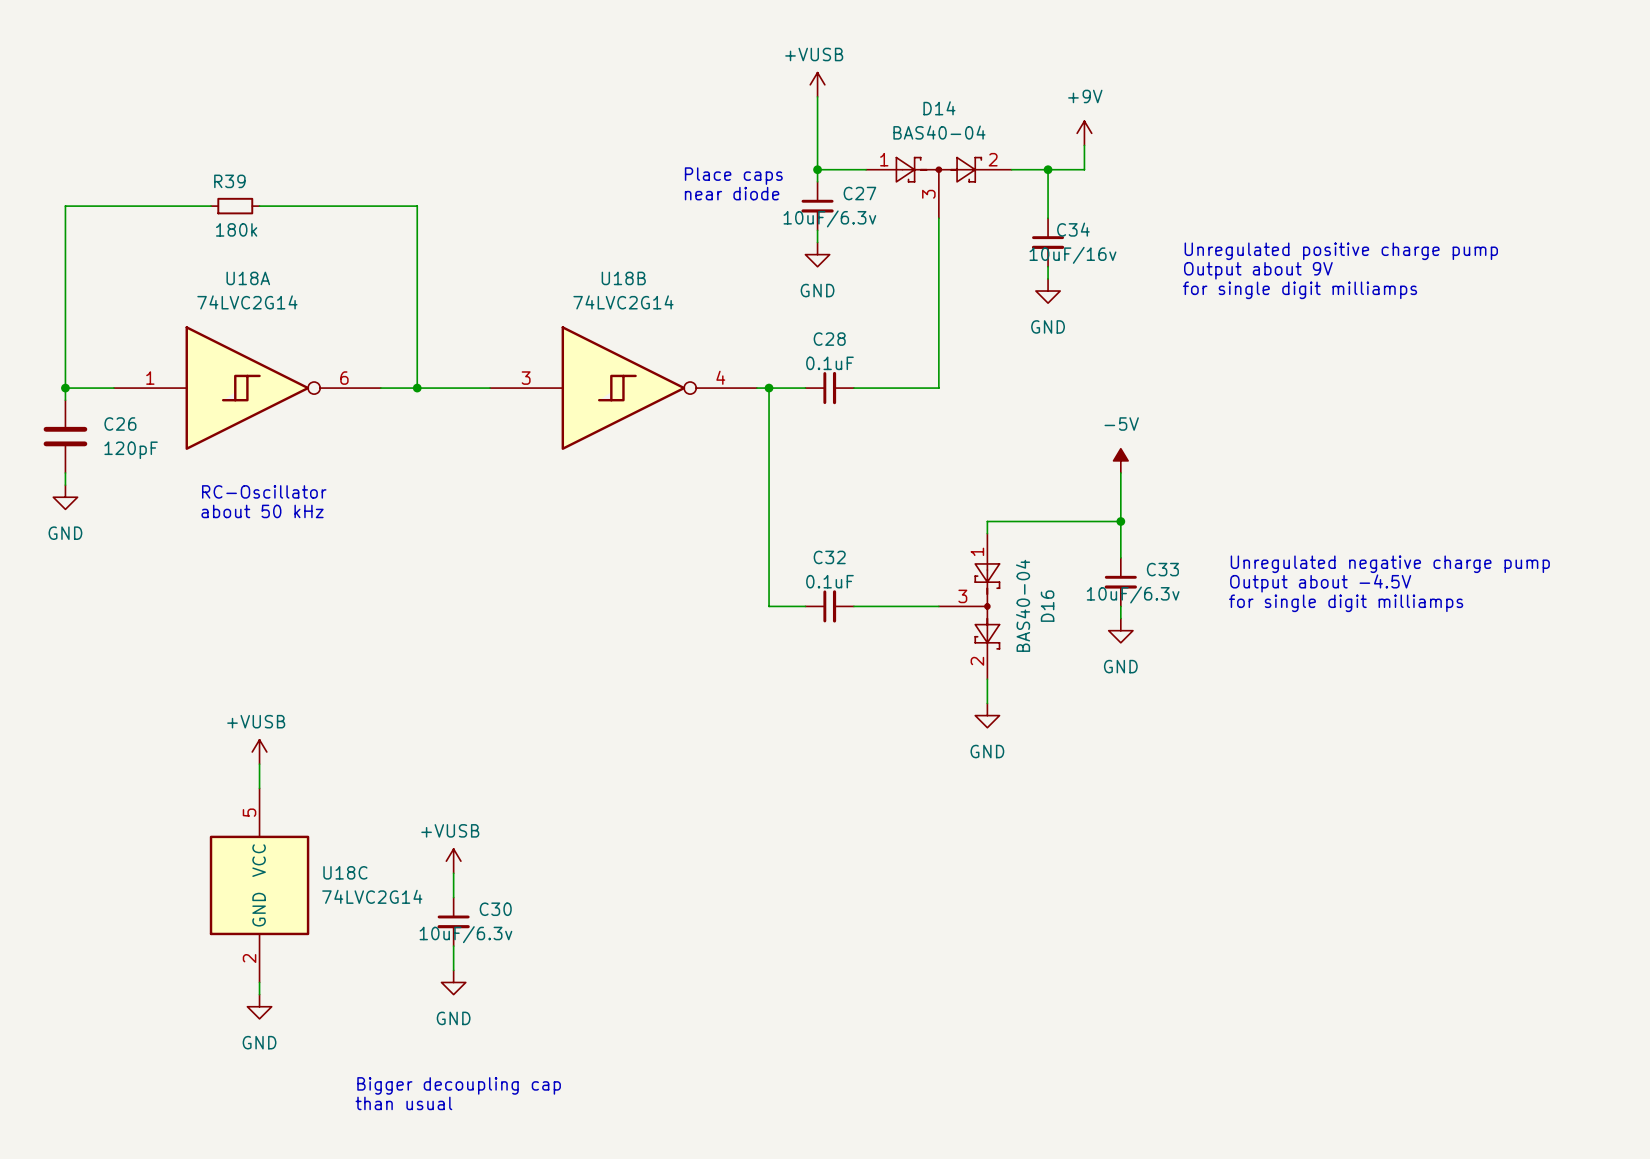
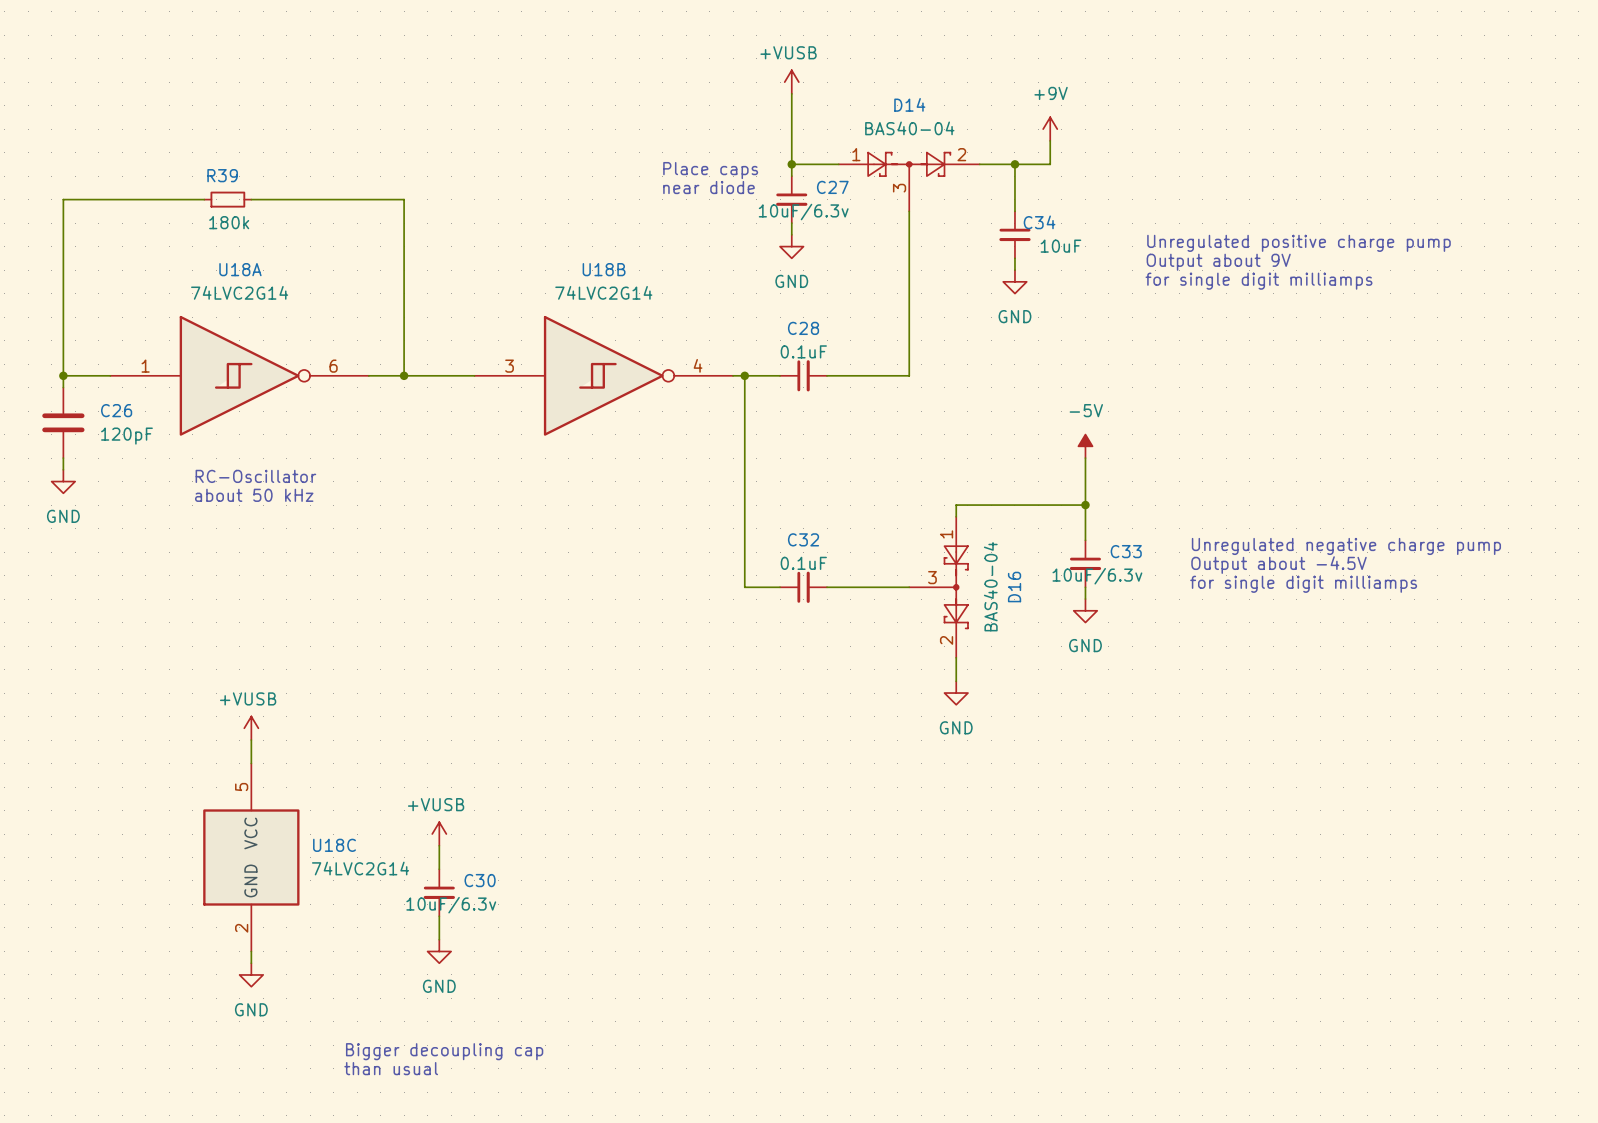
C34 value: 10uF/16v (1072, 255) -> 10uF (1060, 246)

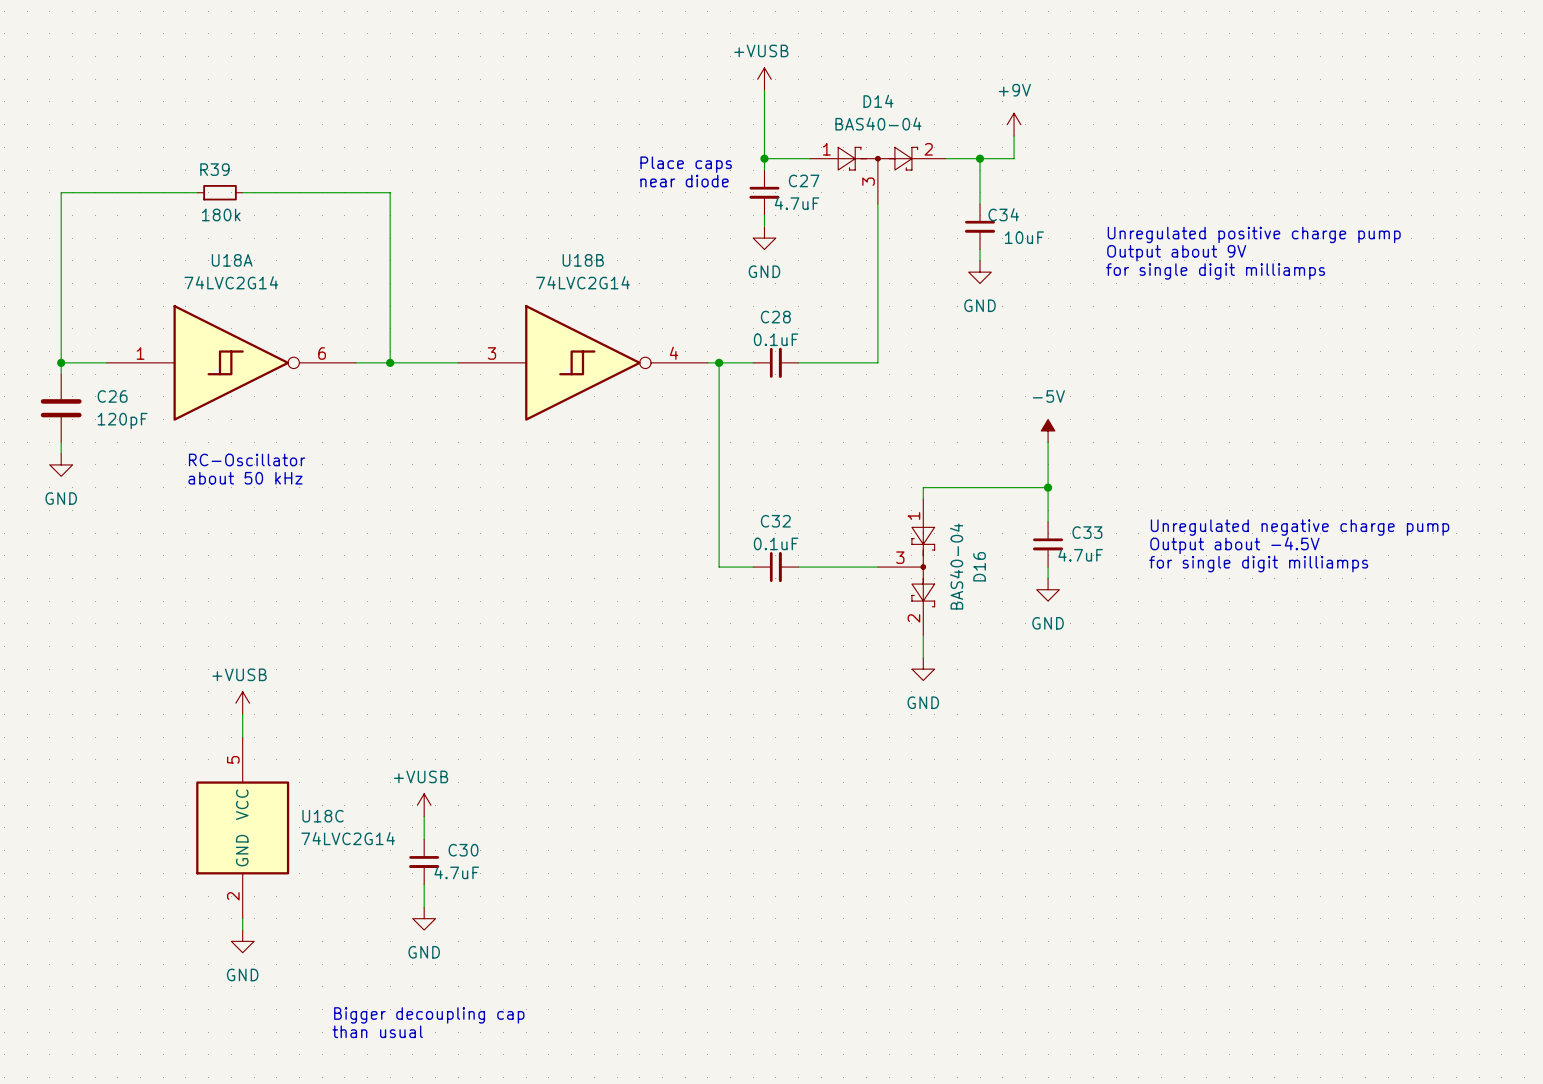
C27 value: 10uF/6.3v (803, 212) -> 4.7uF (797, 203)
C33 value: 10uF/6.3v (1097, 576) -> 4.7uF (1080, 555)
C30 value: 10uF/6.3v (451, 905) -> 4.7uF (456, 872)

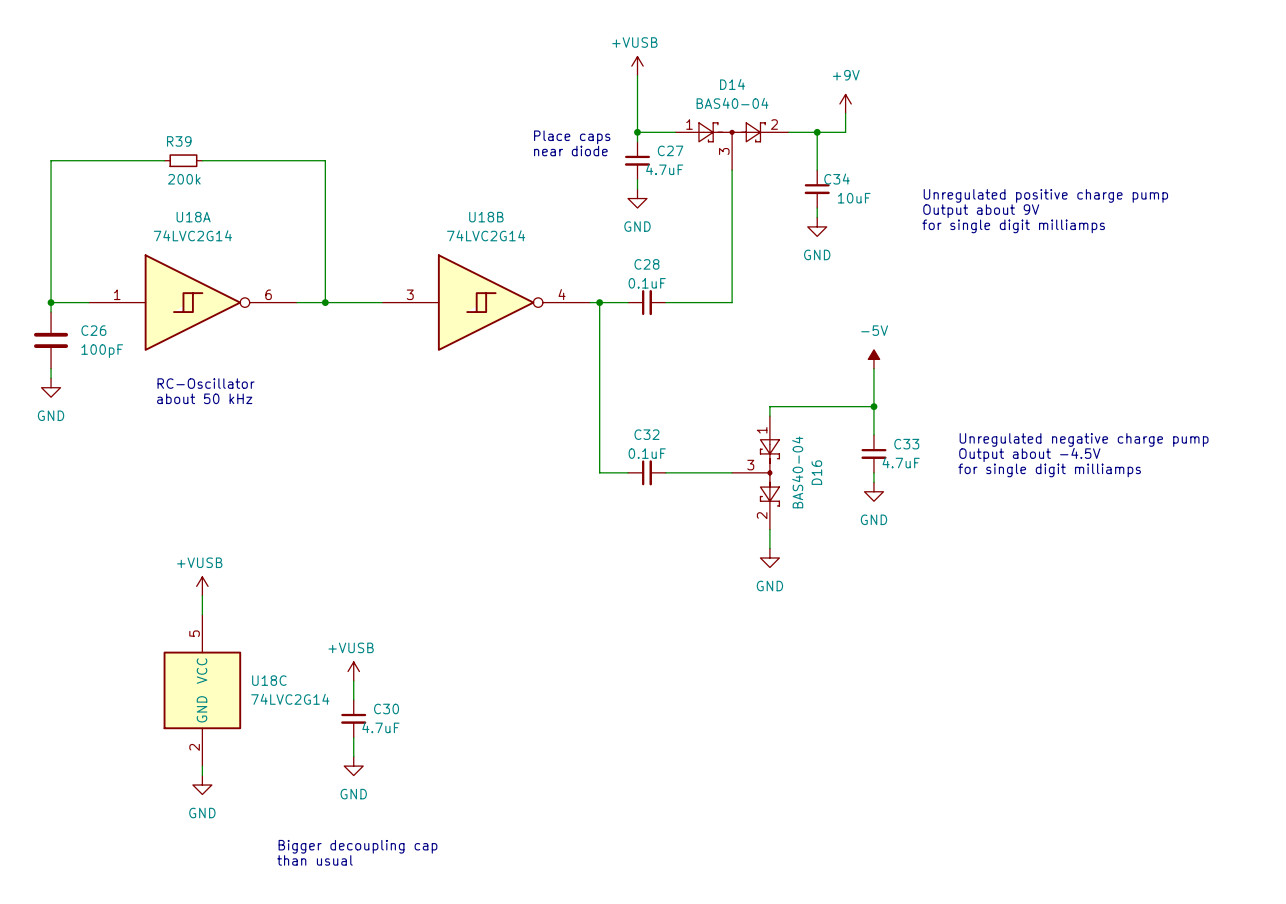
R39 value: 180k (221, 214) -> 200k (184, 179)
C26 value: 120pF (122, 421) -> 100pF (102, 351)

